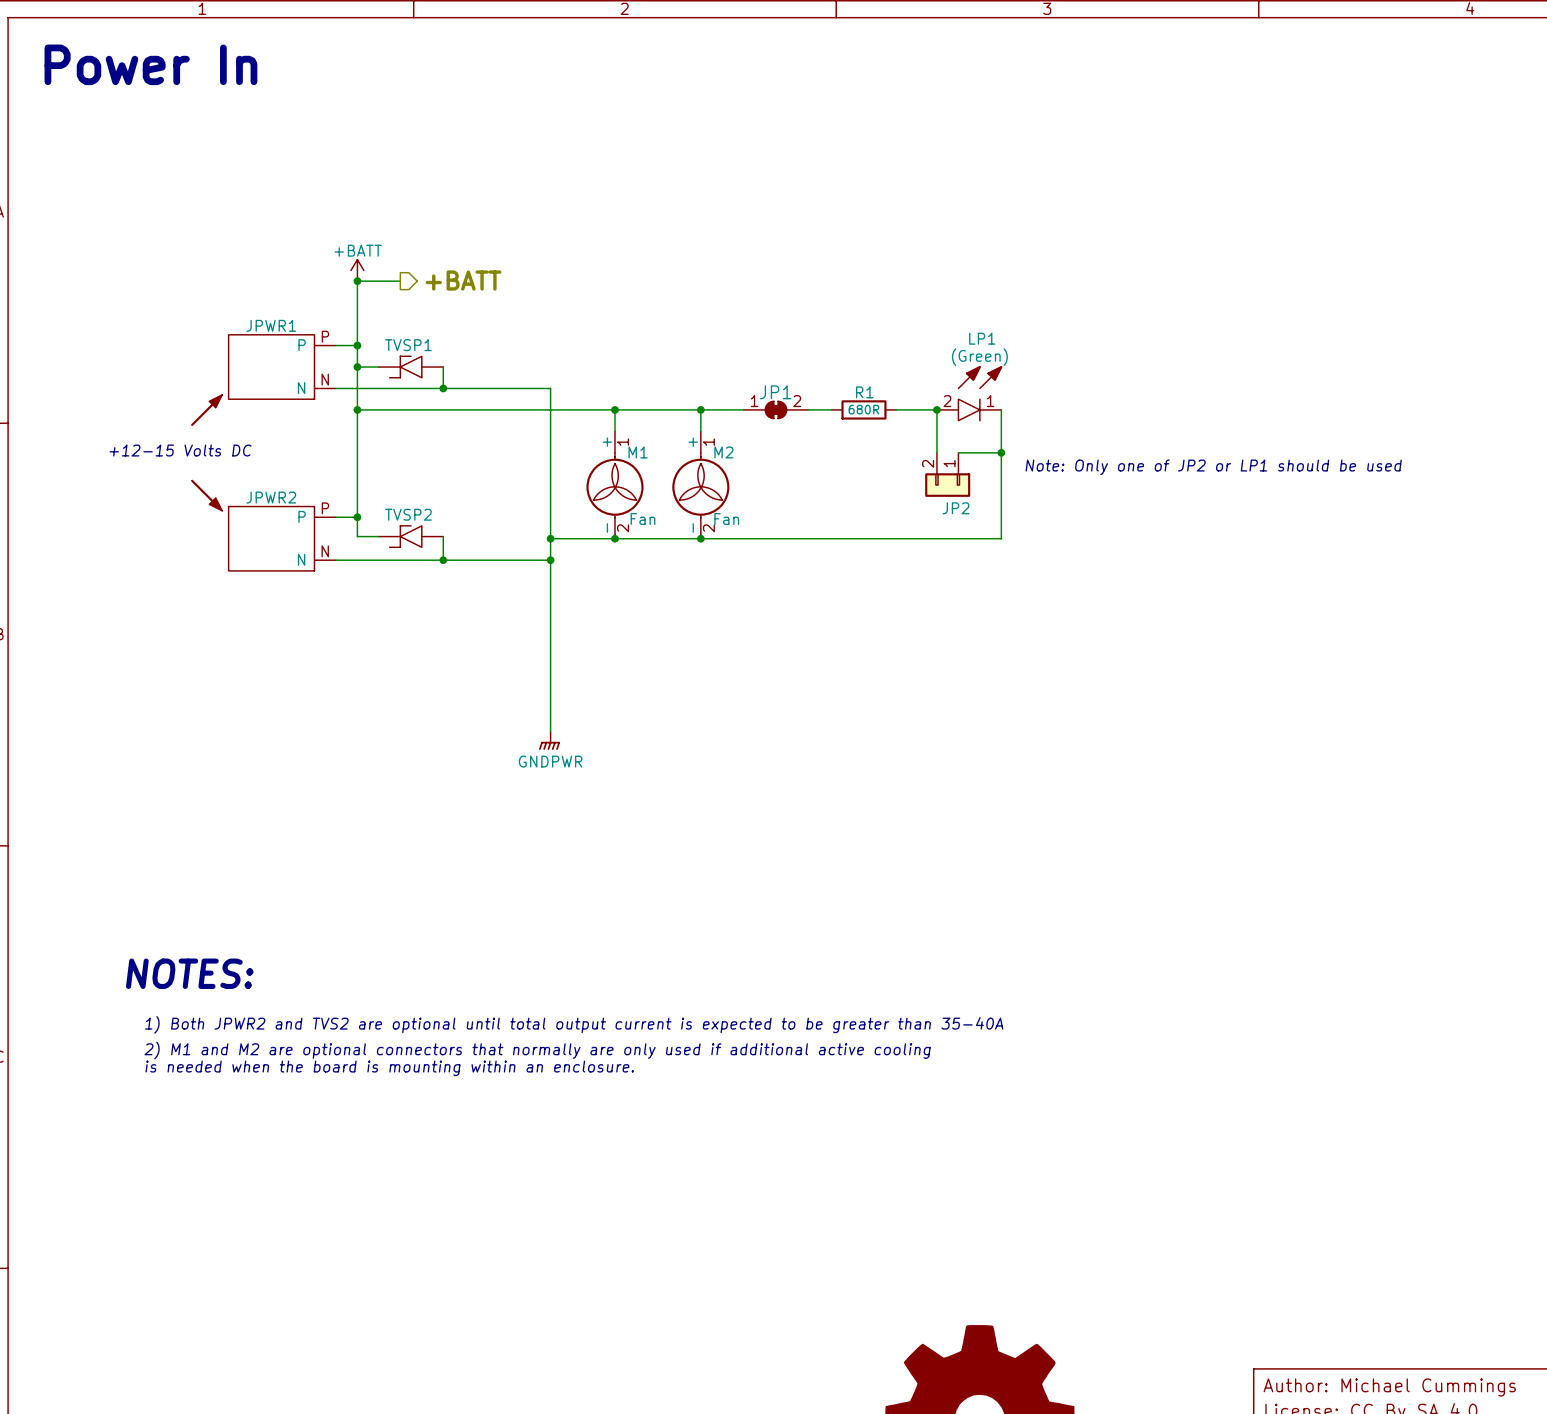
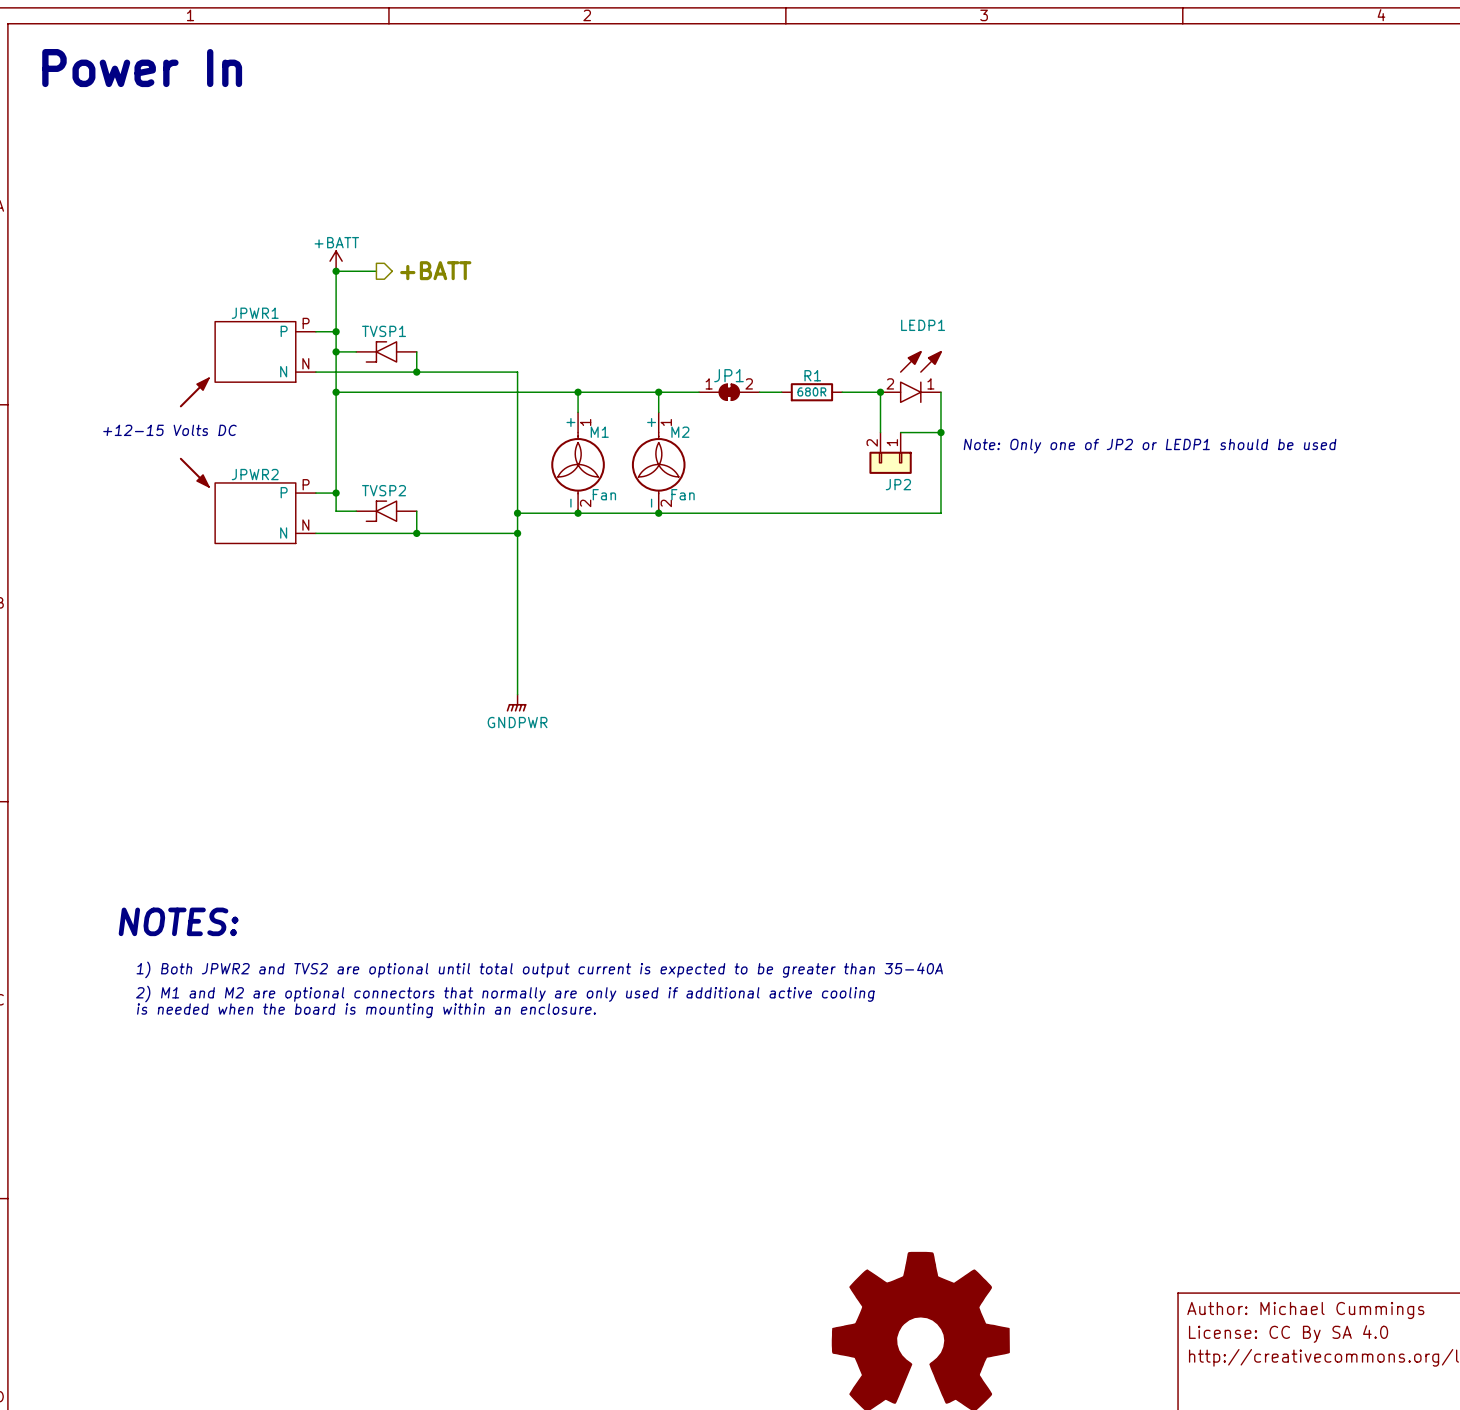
LP1 name: LP1 (982, 338) -> LEDP1 (923, 325)
LP1 text: (Green) (979, 357) -> none
text: Note: Only one of JP2 or LP1 should be used (1213, 467) -> Note: Only one of JP2 or LEDP1 should be used (1150, 446)

